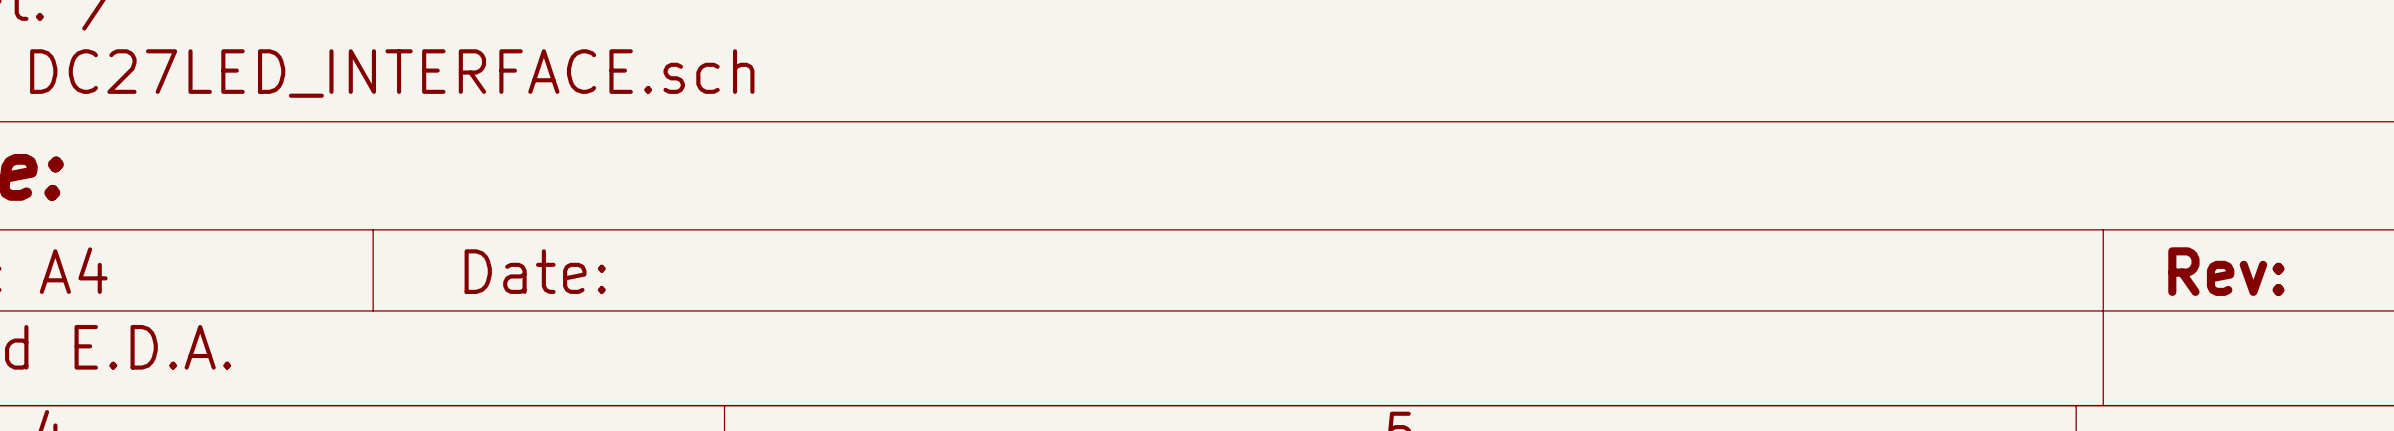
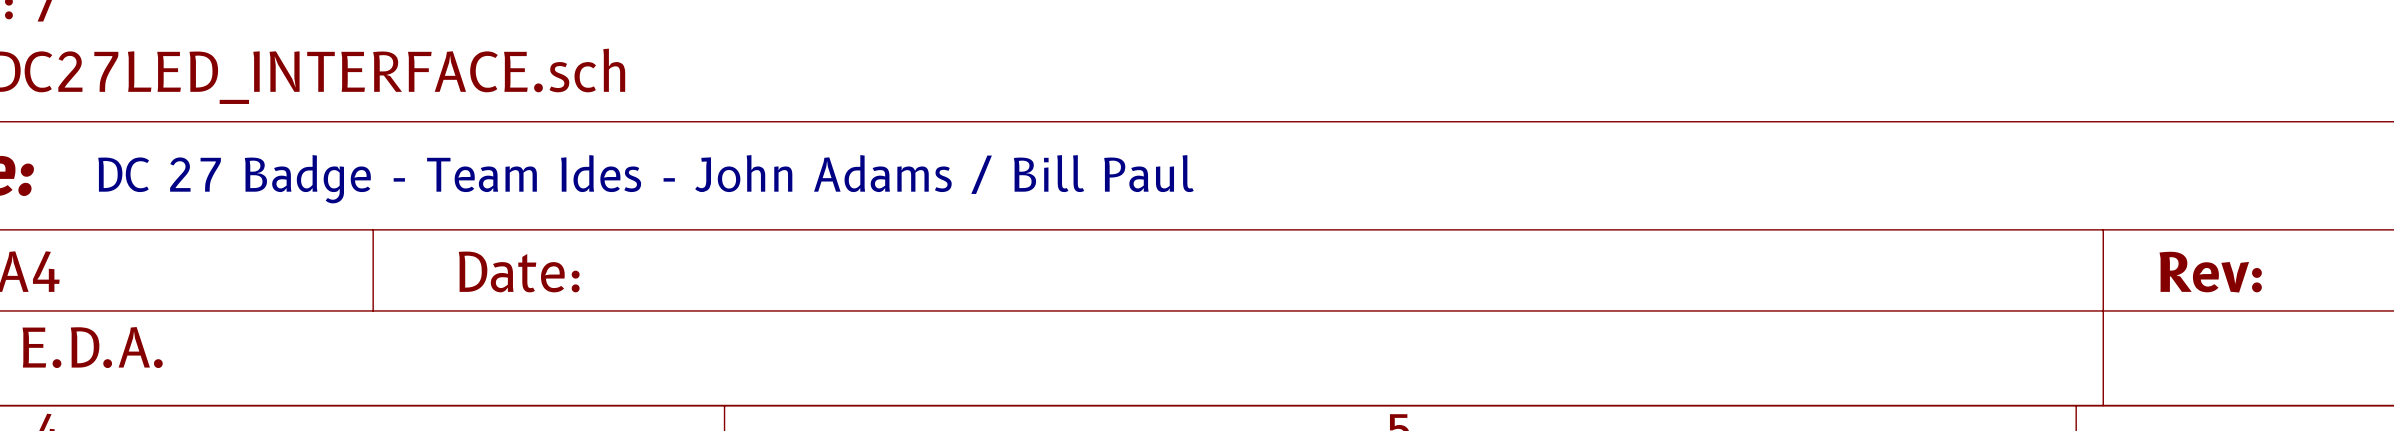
text: none -> DC 27 Badge - Team Ides - John Adams / Bill Paul (645, 179)

